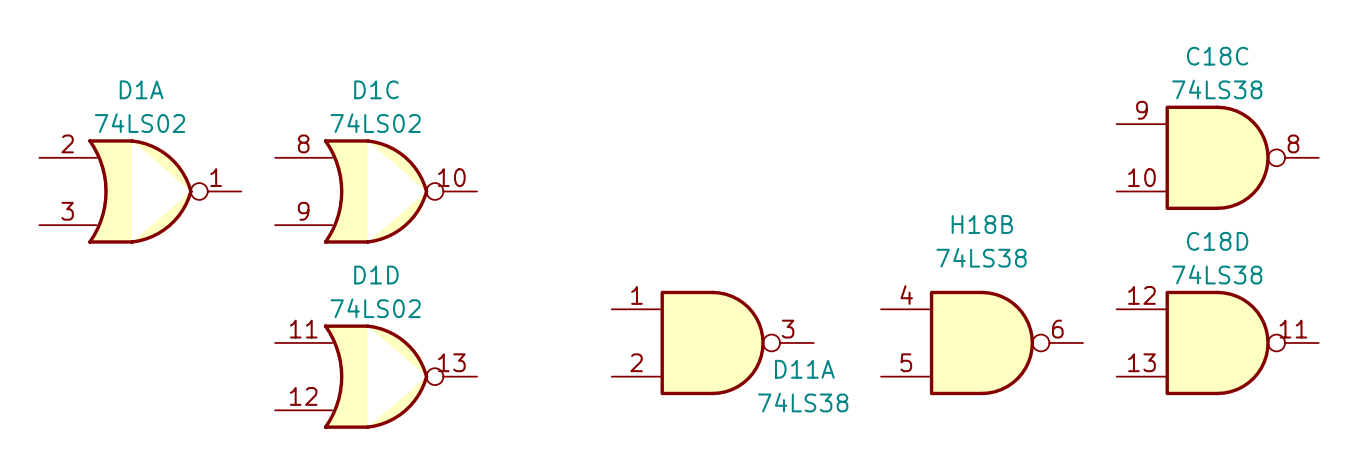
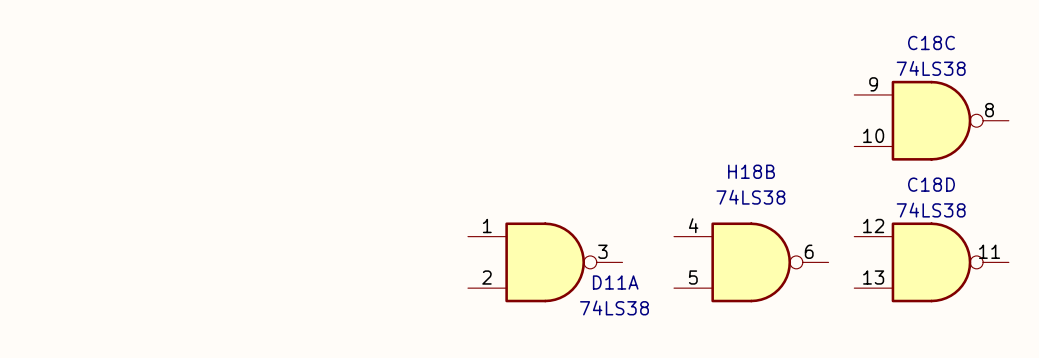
D1A: 74LS02 (140, 191) -> none
D1C: 74LS02 (376, 191) -> none
D1D: 74LS02 (376, 376) -> none

